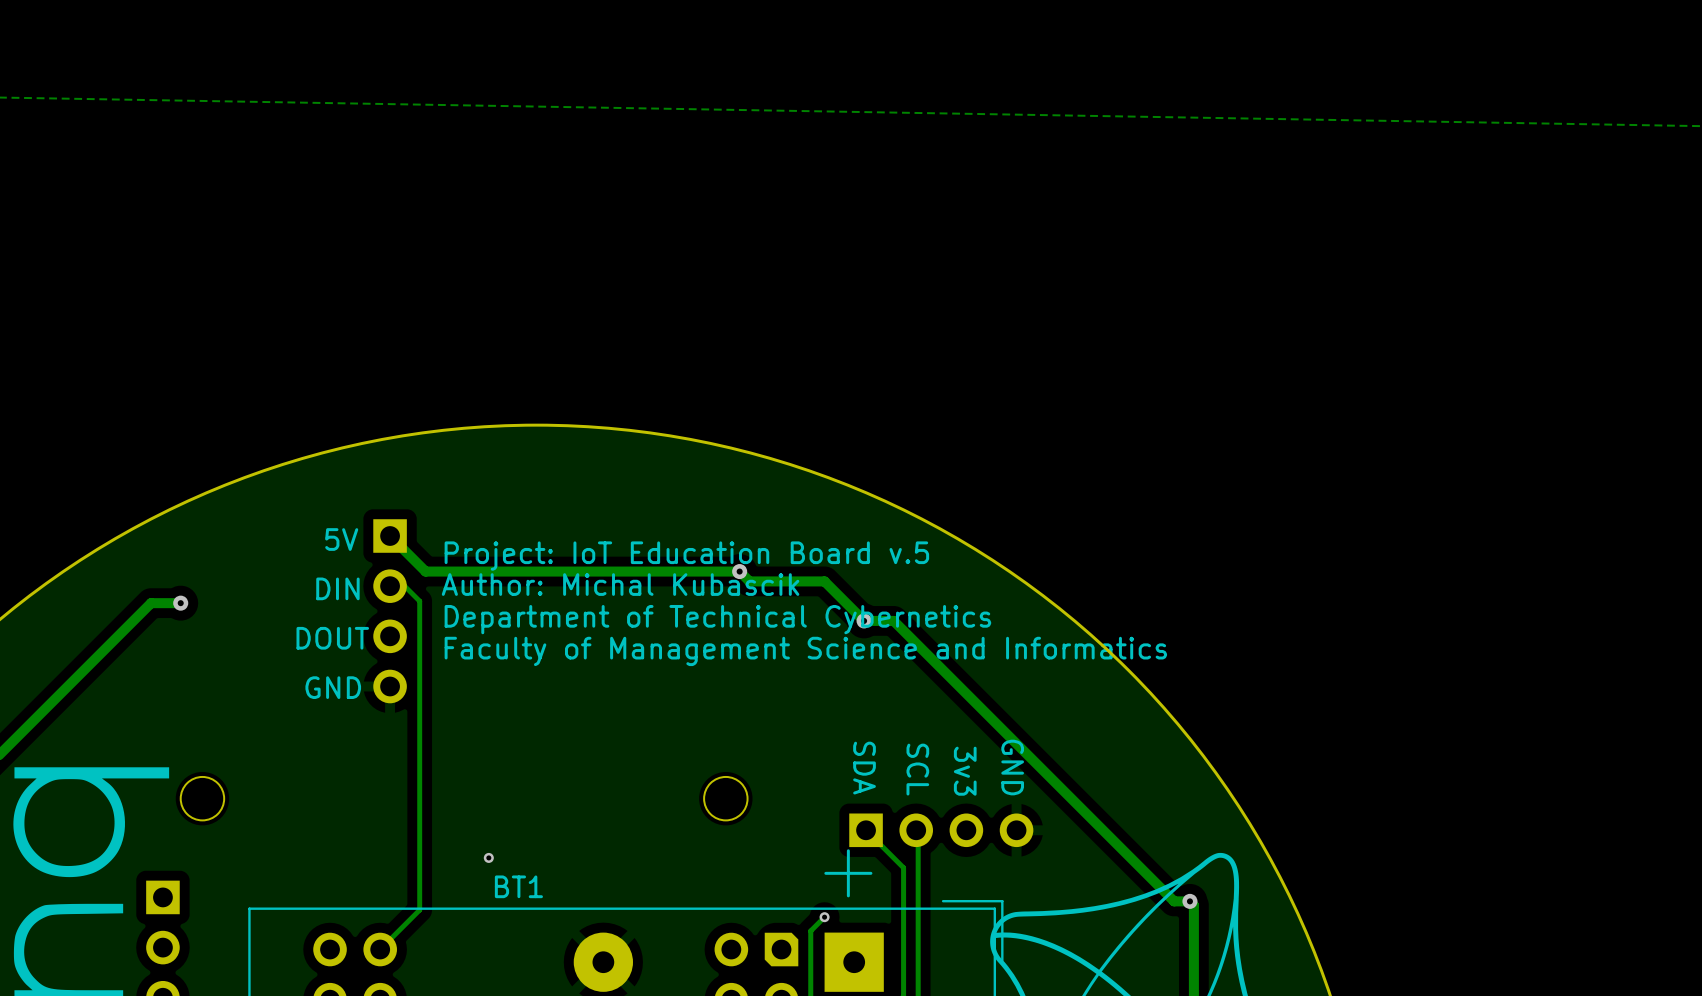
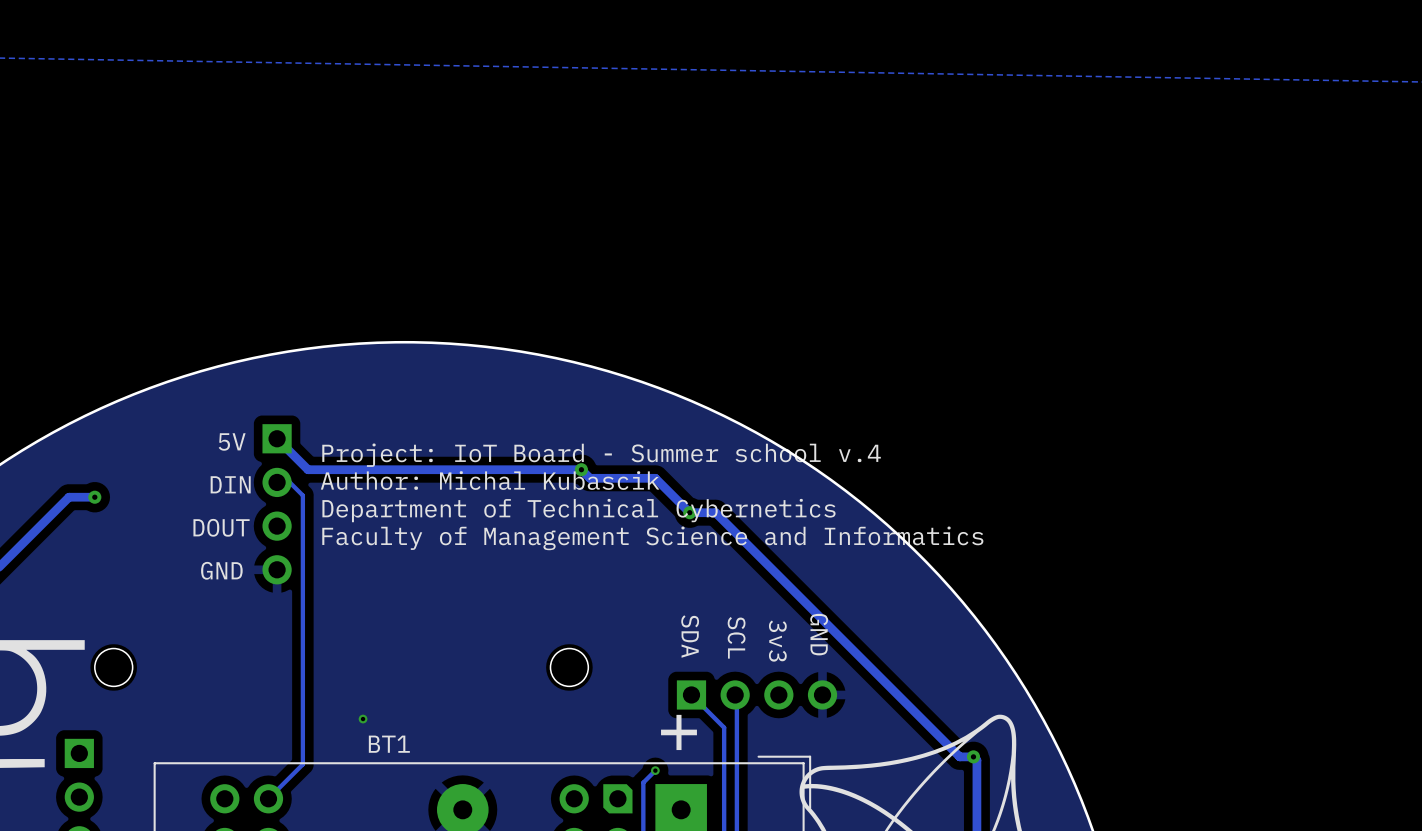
text: Project: IoT Education Board v.5 (686, 556) -> Project: IoT Board - Summer school v.4 (601, 455)

